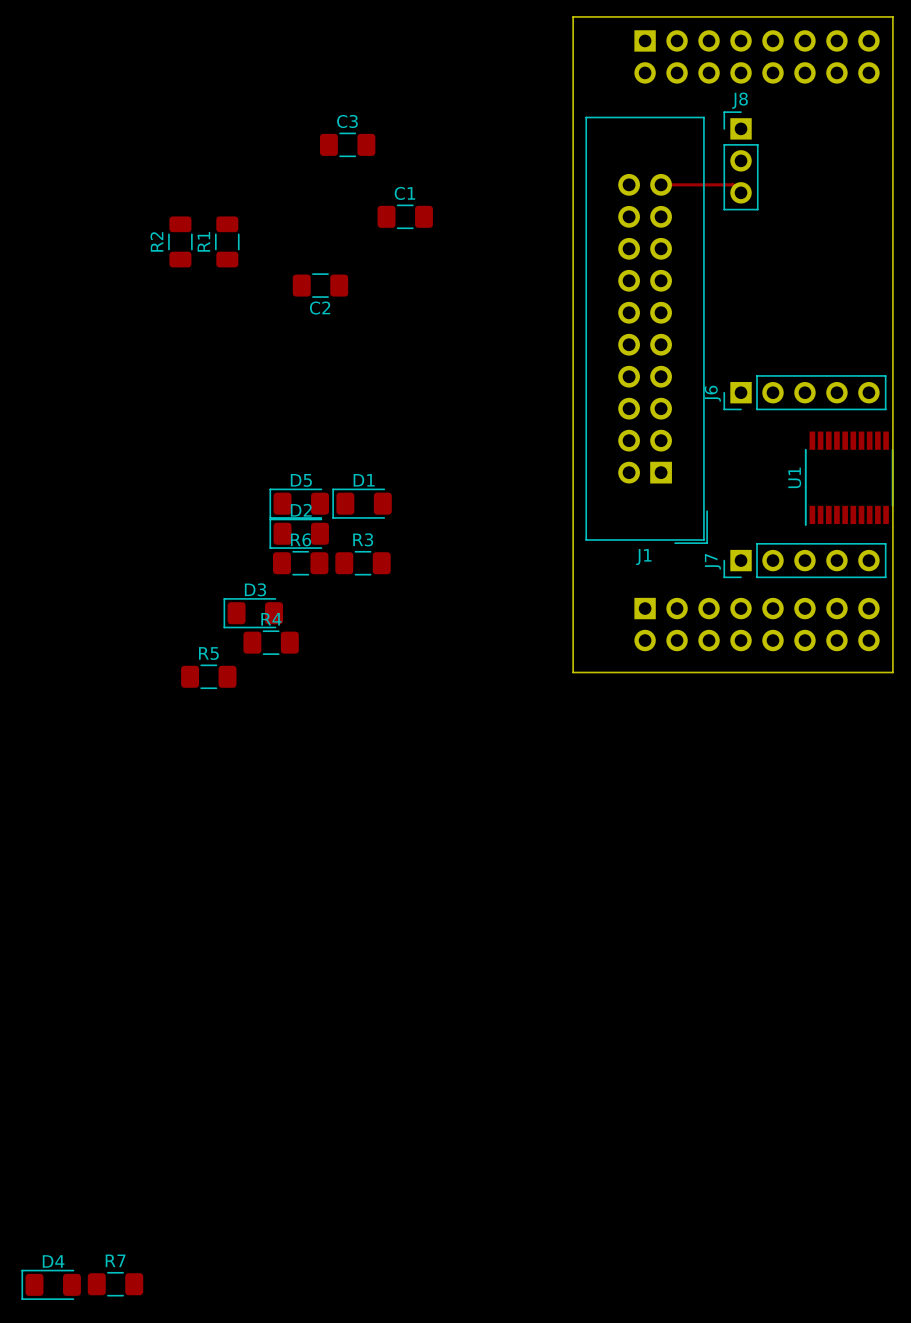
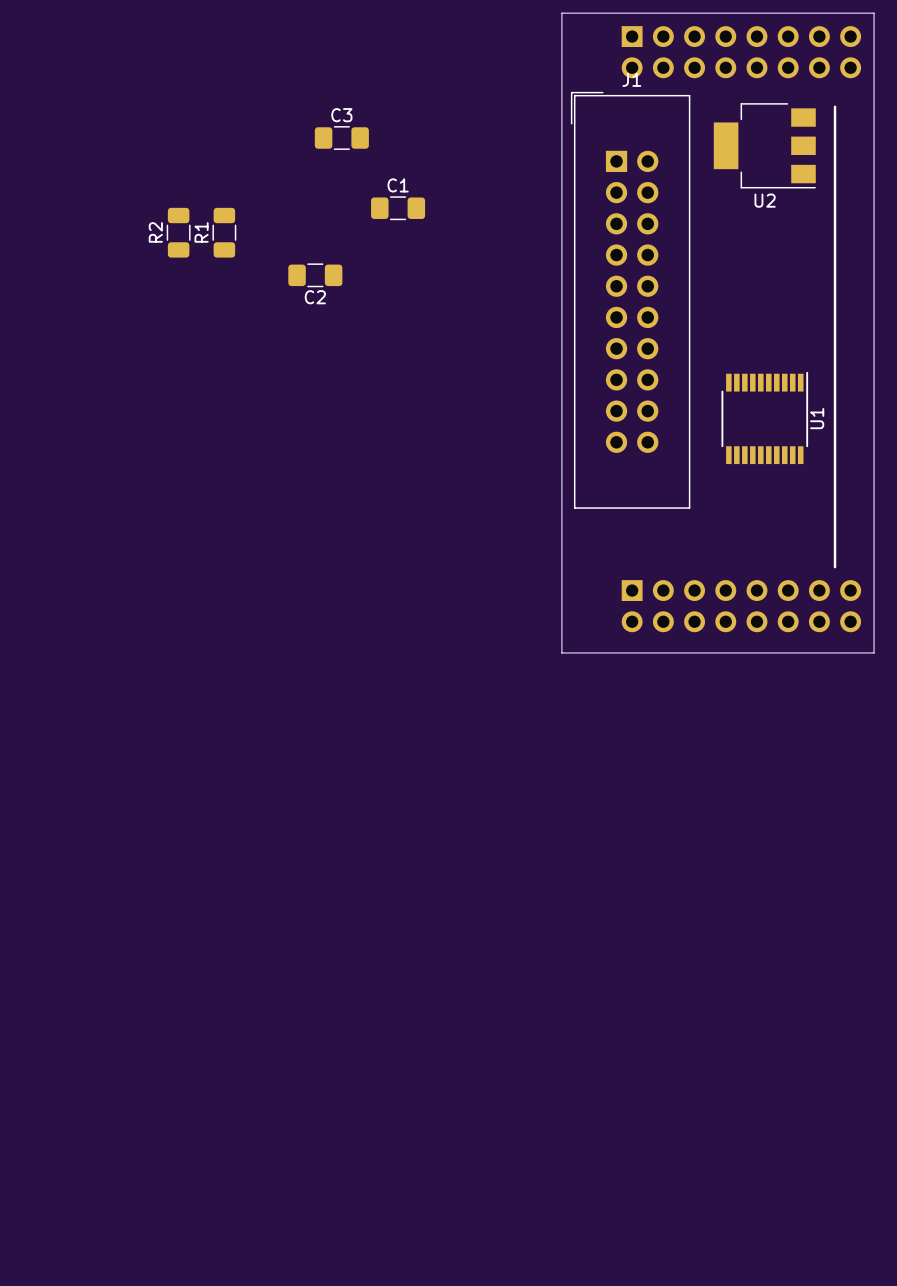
line: none -> (835, 106) (835, 567)
U2: none -> (764, 145)
J8: (741, 160) -> none
track: (661, 184) (733, 184) (741, 192) -> none
J1 rotation: 0° (646, 330) -> 180° (630, 300)
J6: (804, 392) -> none
U1 rotation: 0° (849, 478) -> 180° (764, 417)
U1 position: (849, 478) -> (764, 417)
D5: (299, 503) -> none
D1: (362, 503) -> none
D2: (299, 533) -> none
J7: (804, 560) -> none
R6: (300, 563) -> none
R3: (363, 563) -> none
D3: (253, 613) -> none
R4: (271, 642) -> none
R5: (208, 676) -> none
D4: (51, 1284) -> none
R7: (115, 1284) -> none

